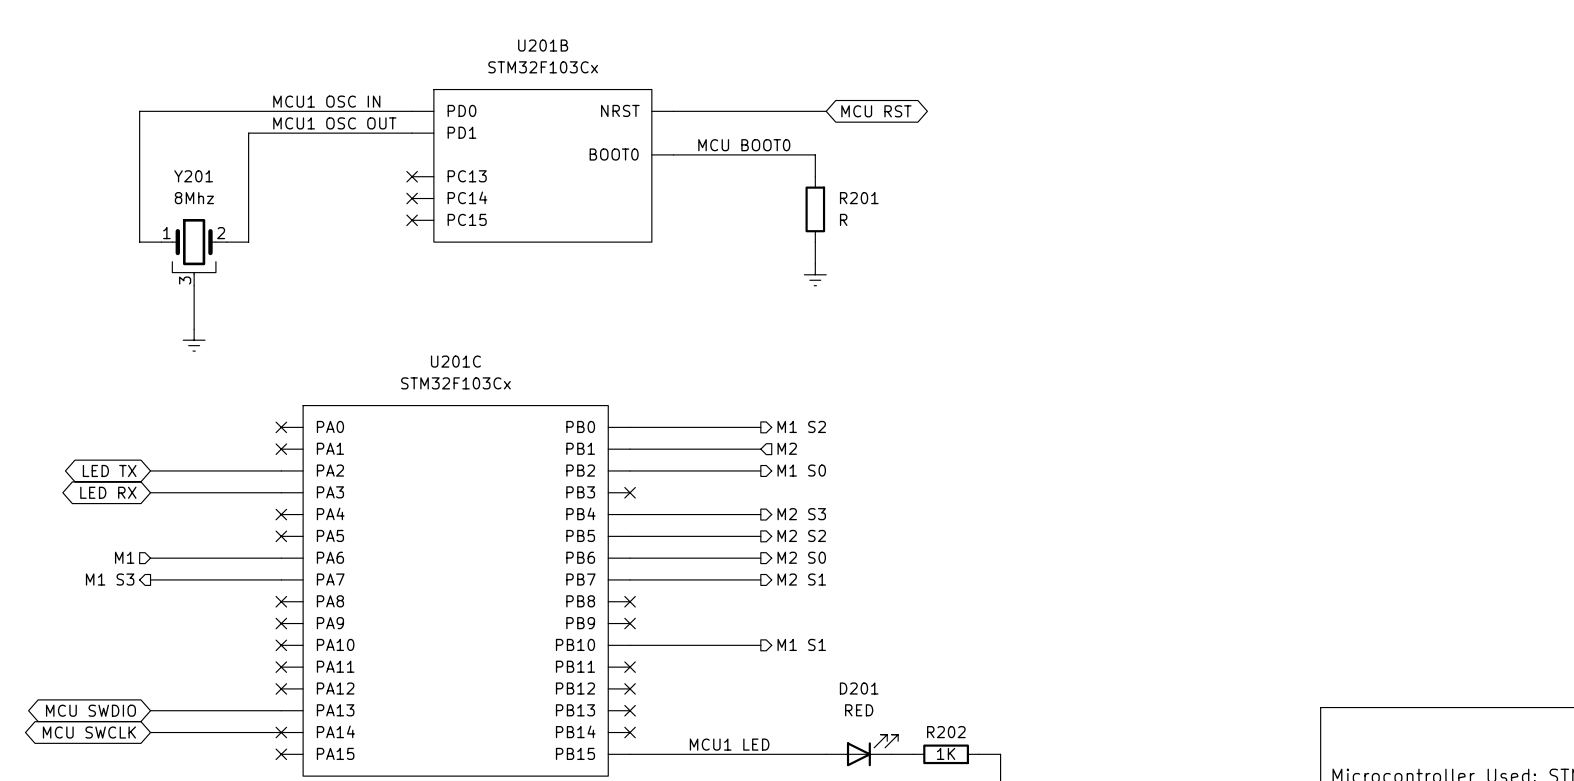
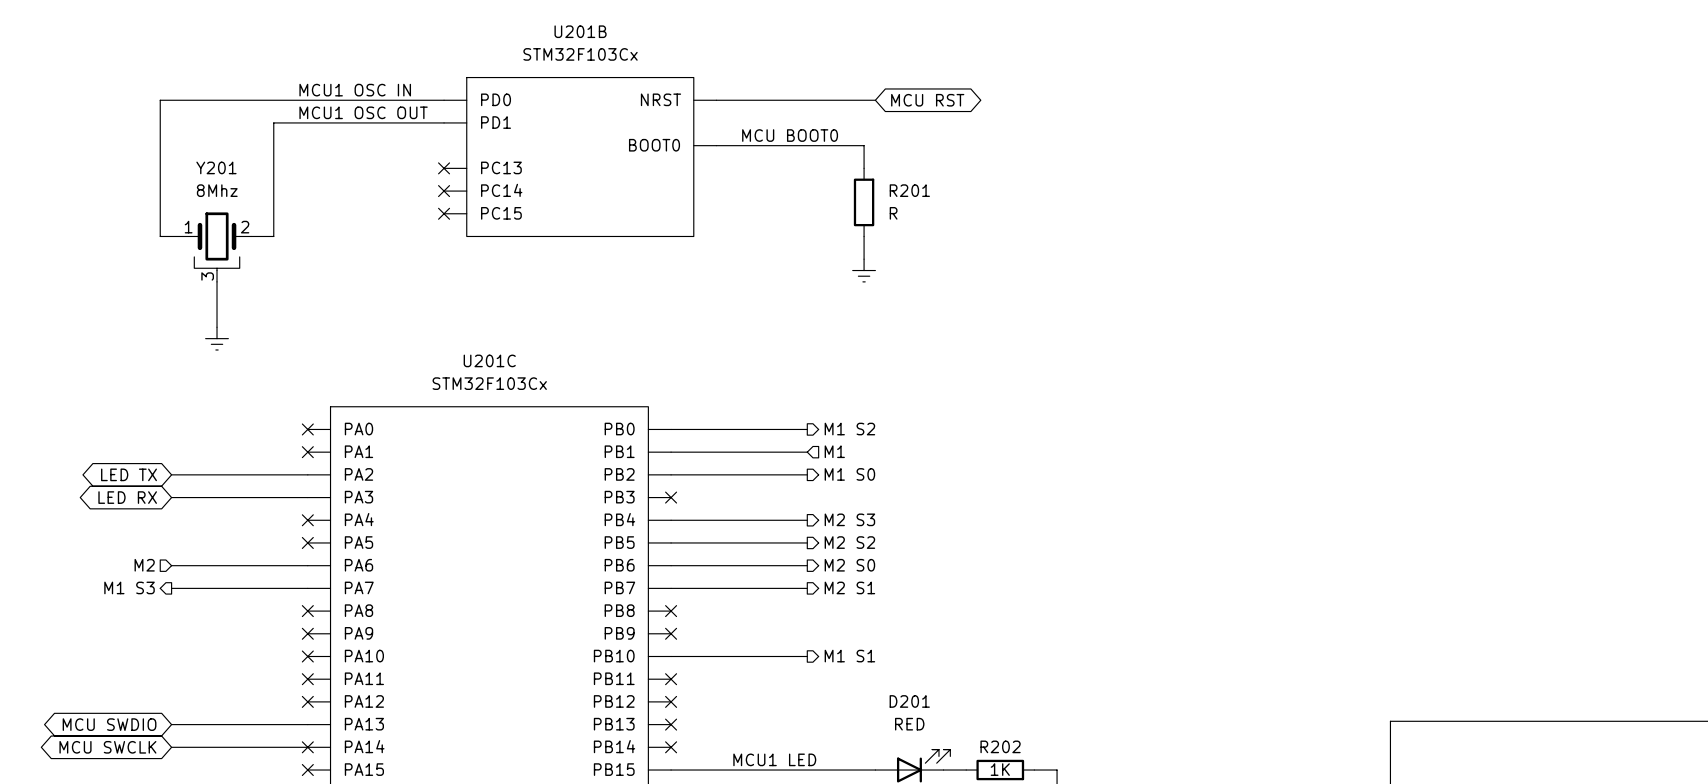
hierarchical label: M2 (787, 448) -> M1 (834, 451)
hierarchical label: M1 (124, 557) -> M2 (144, 565)

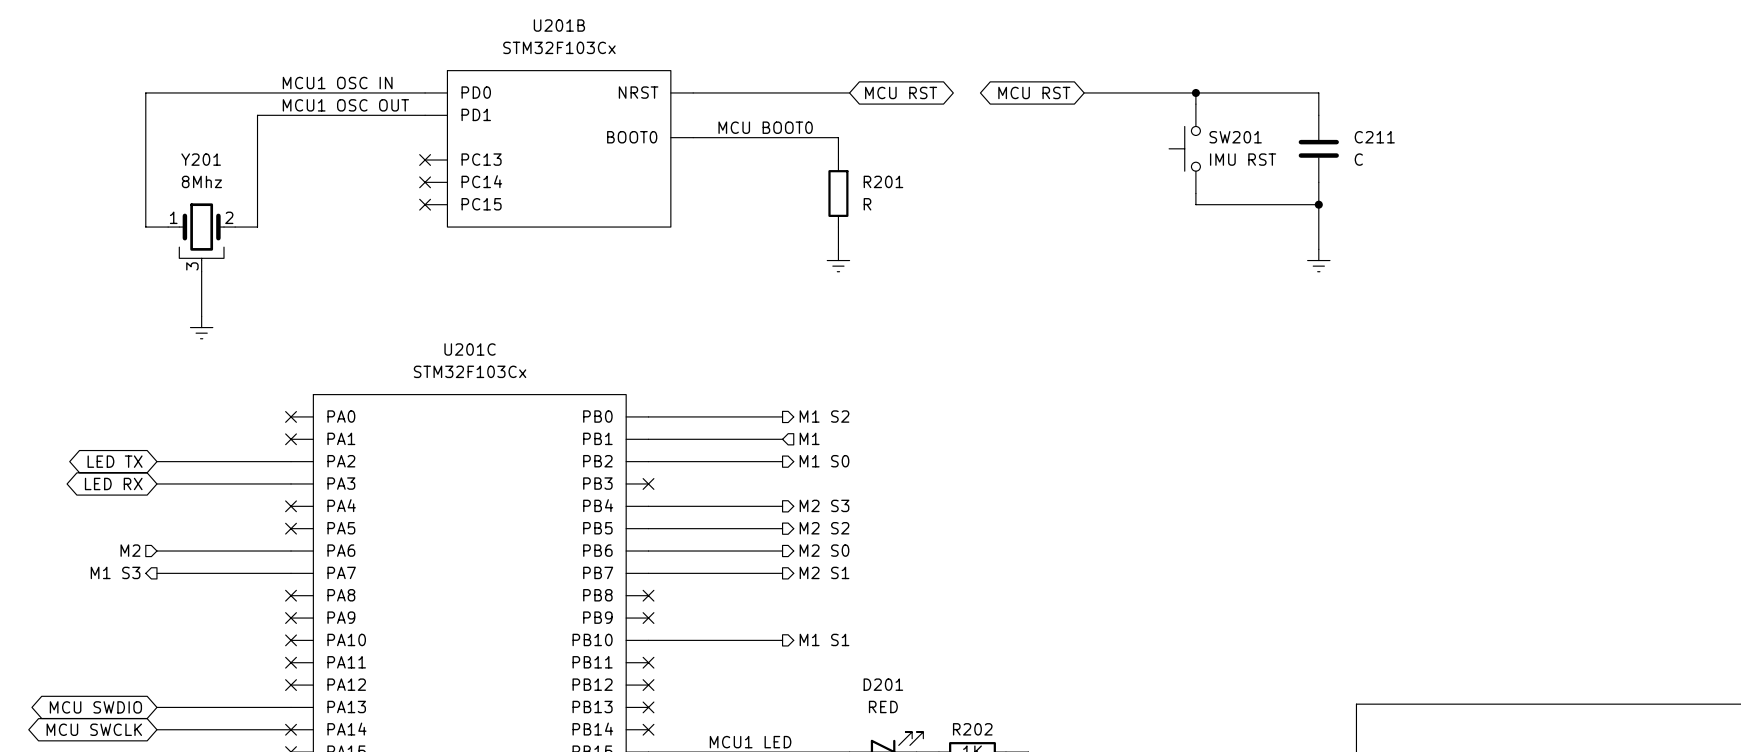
global label: none -> MCU RST (1034, 92)
wire: none -> (1084, 92) (1318, 92) (1318, 115)
wire: none -> (1195, 92) (1195, 104)
junction: none -> (1195, 92)
SW201: none -> IMU RST (1184, 148)
C211: none -> C (1318, 148)
wire: none -> (1318, 182) (1318, 249)
wire: none -> (1195, 193) (1195, 204) (1318, 204)
junction: none -> (1318, 204)
power symbol: none -> (1318, 260)

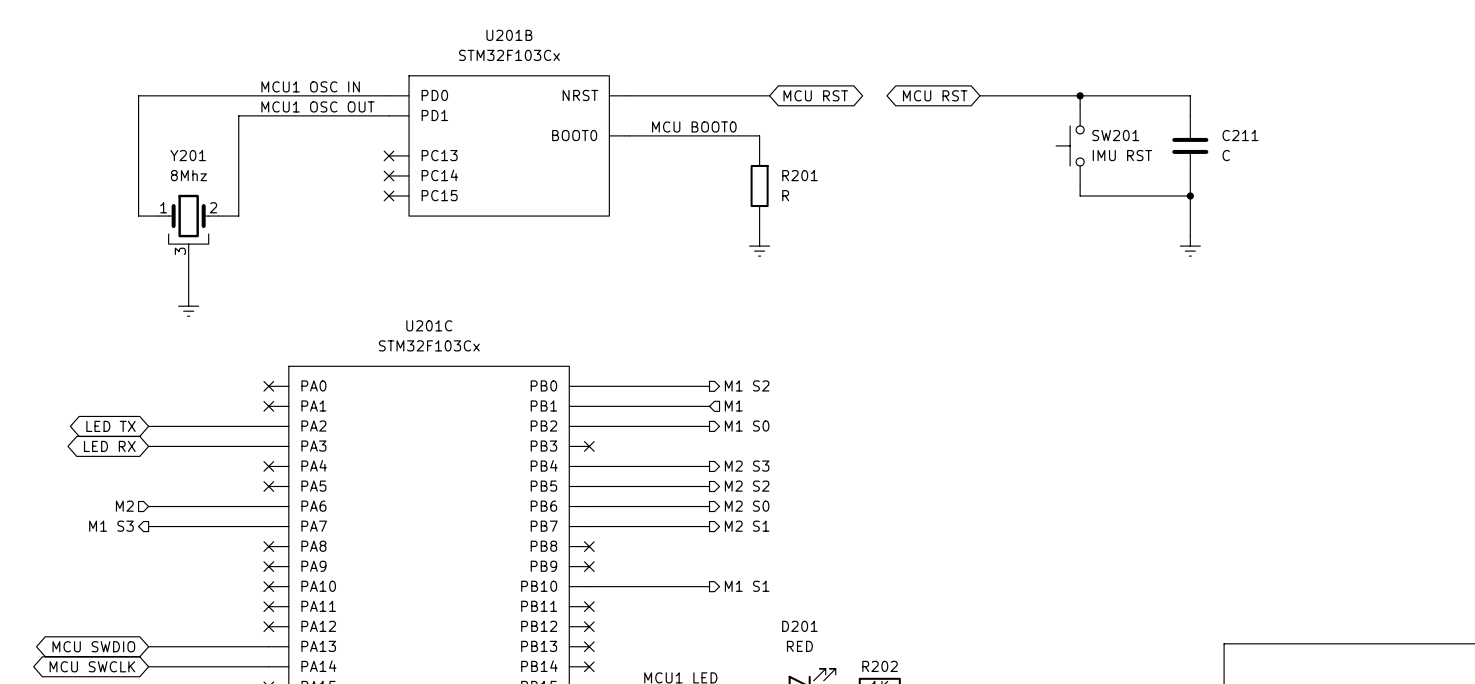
no-connect mark: (291, 729) -> none

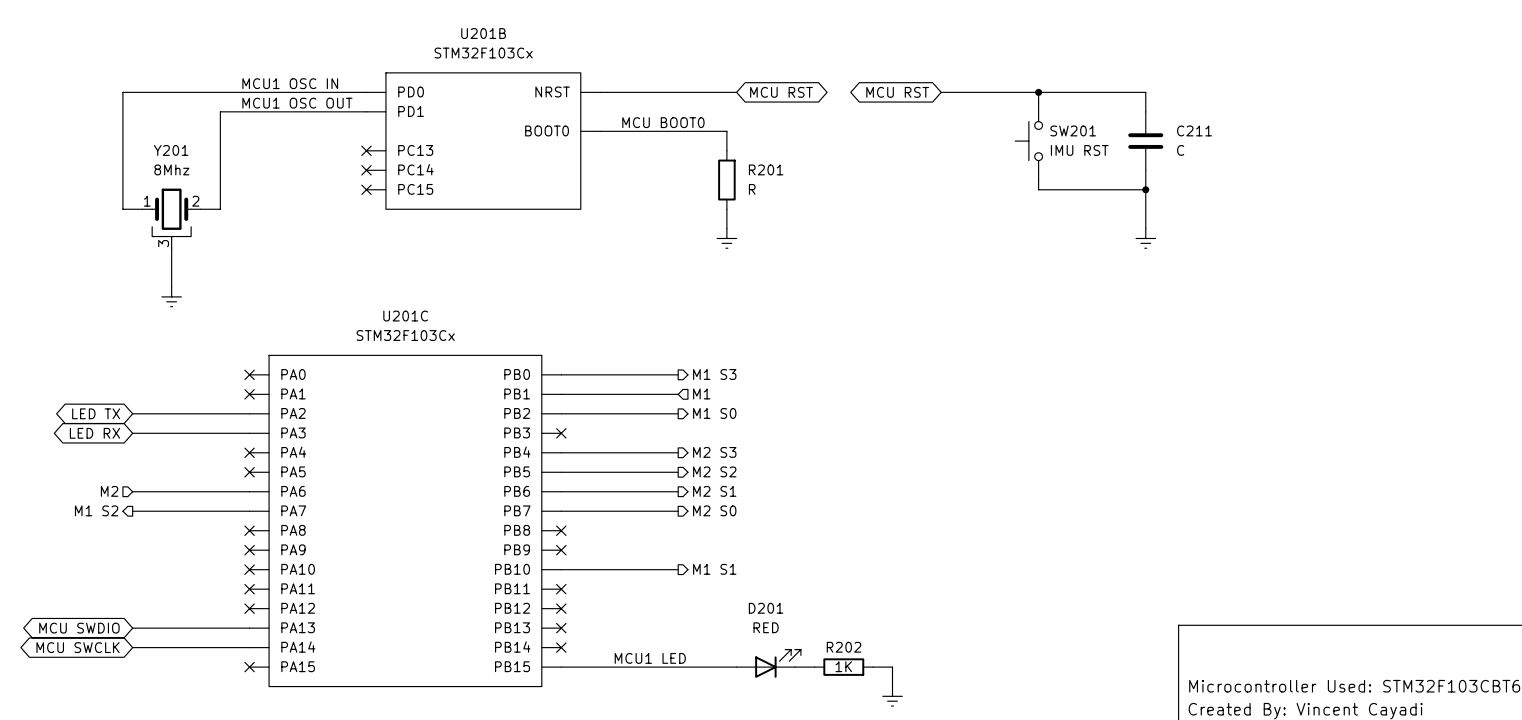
hierarchical label: M1 S2 (747, 385) -> M1 S3 (714, 374)
hierarchical label: M2 S0 (747, 506) -> M2 S1 (714, 491)
hierarchical label: M1 S3 (111, 526) -> M1 S2 (96, 510)
hierarchical label: M2 S1 (747, 526) -> M2 S0 (714, 510)

